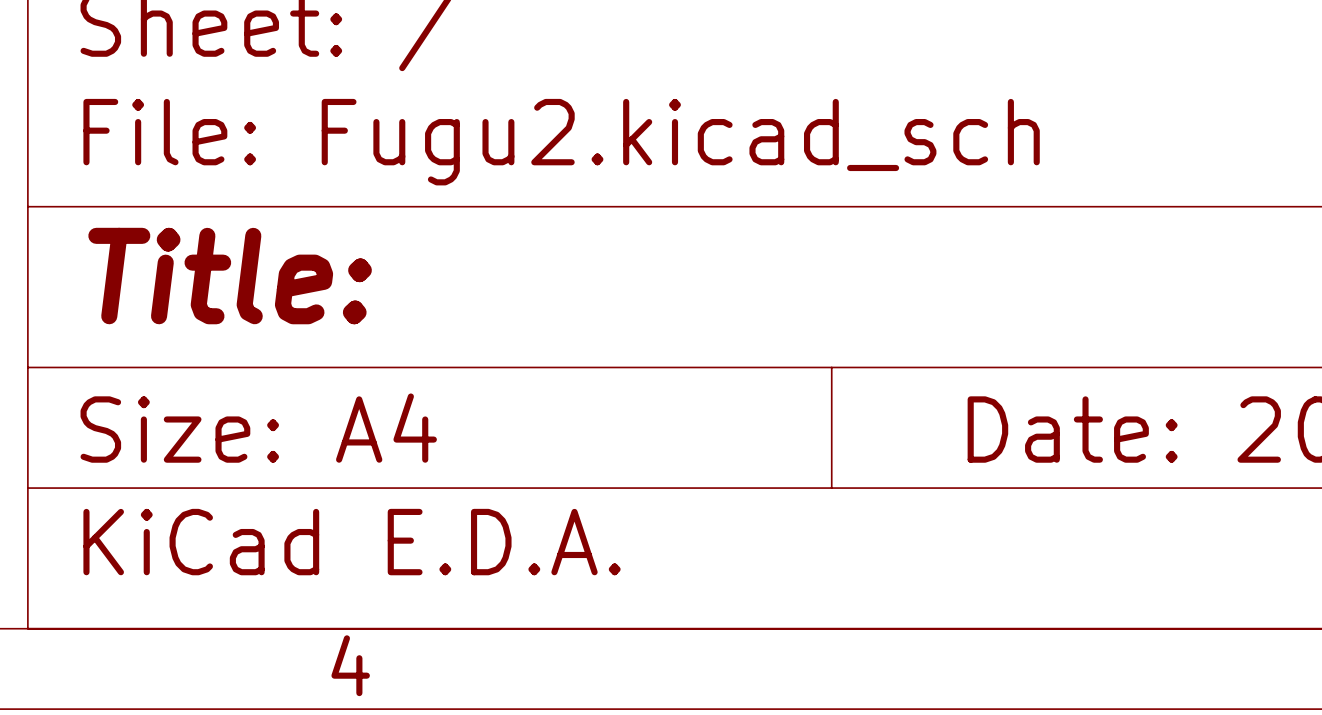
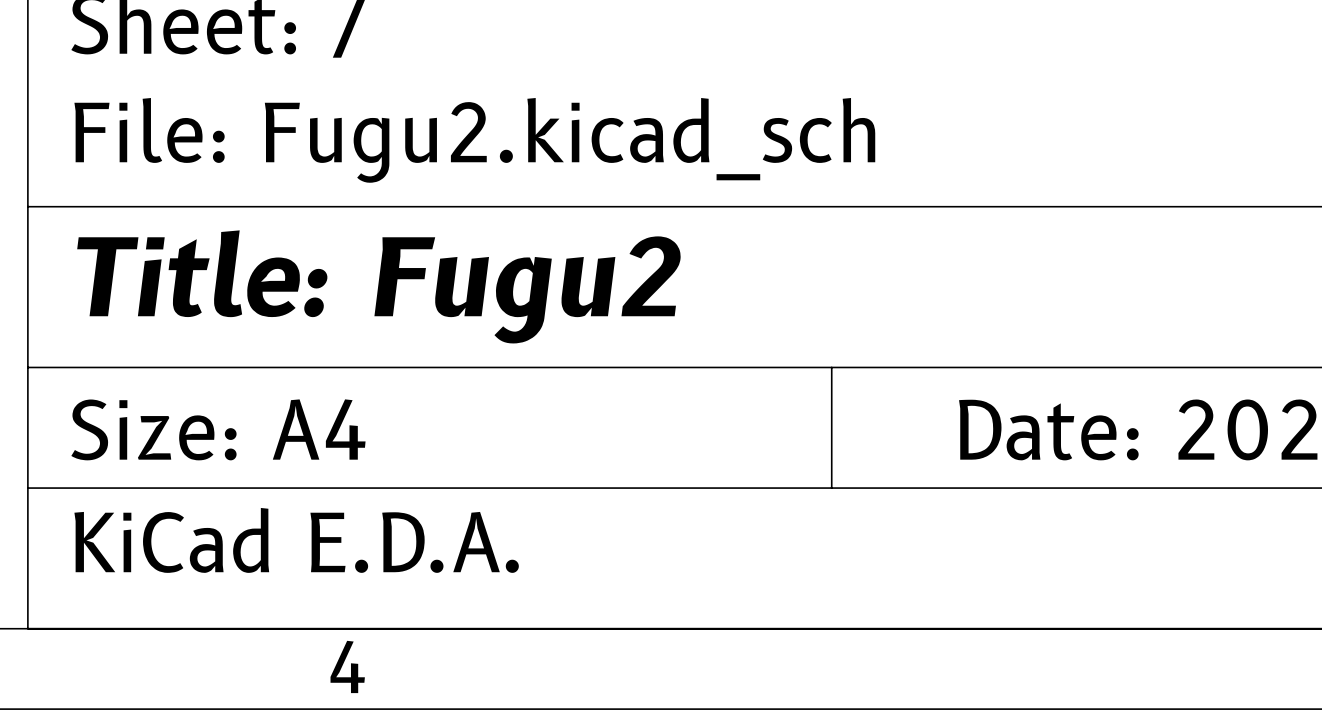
title block: Title: (230, 276) -> Title: Fugu2 (379, 286)

